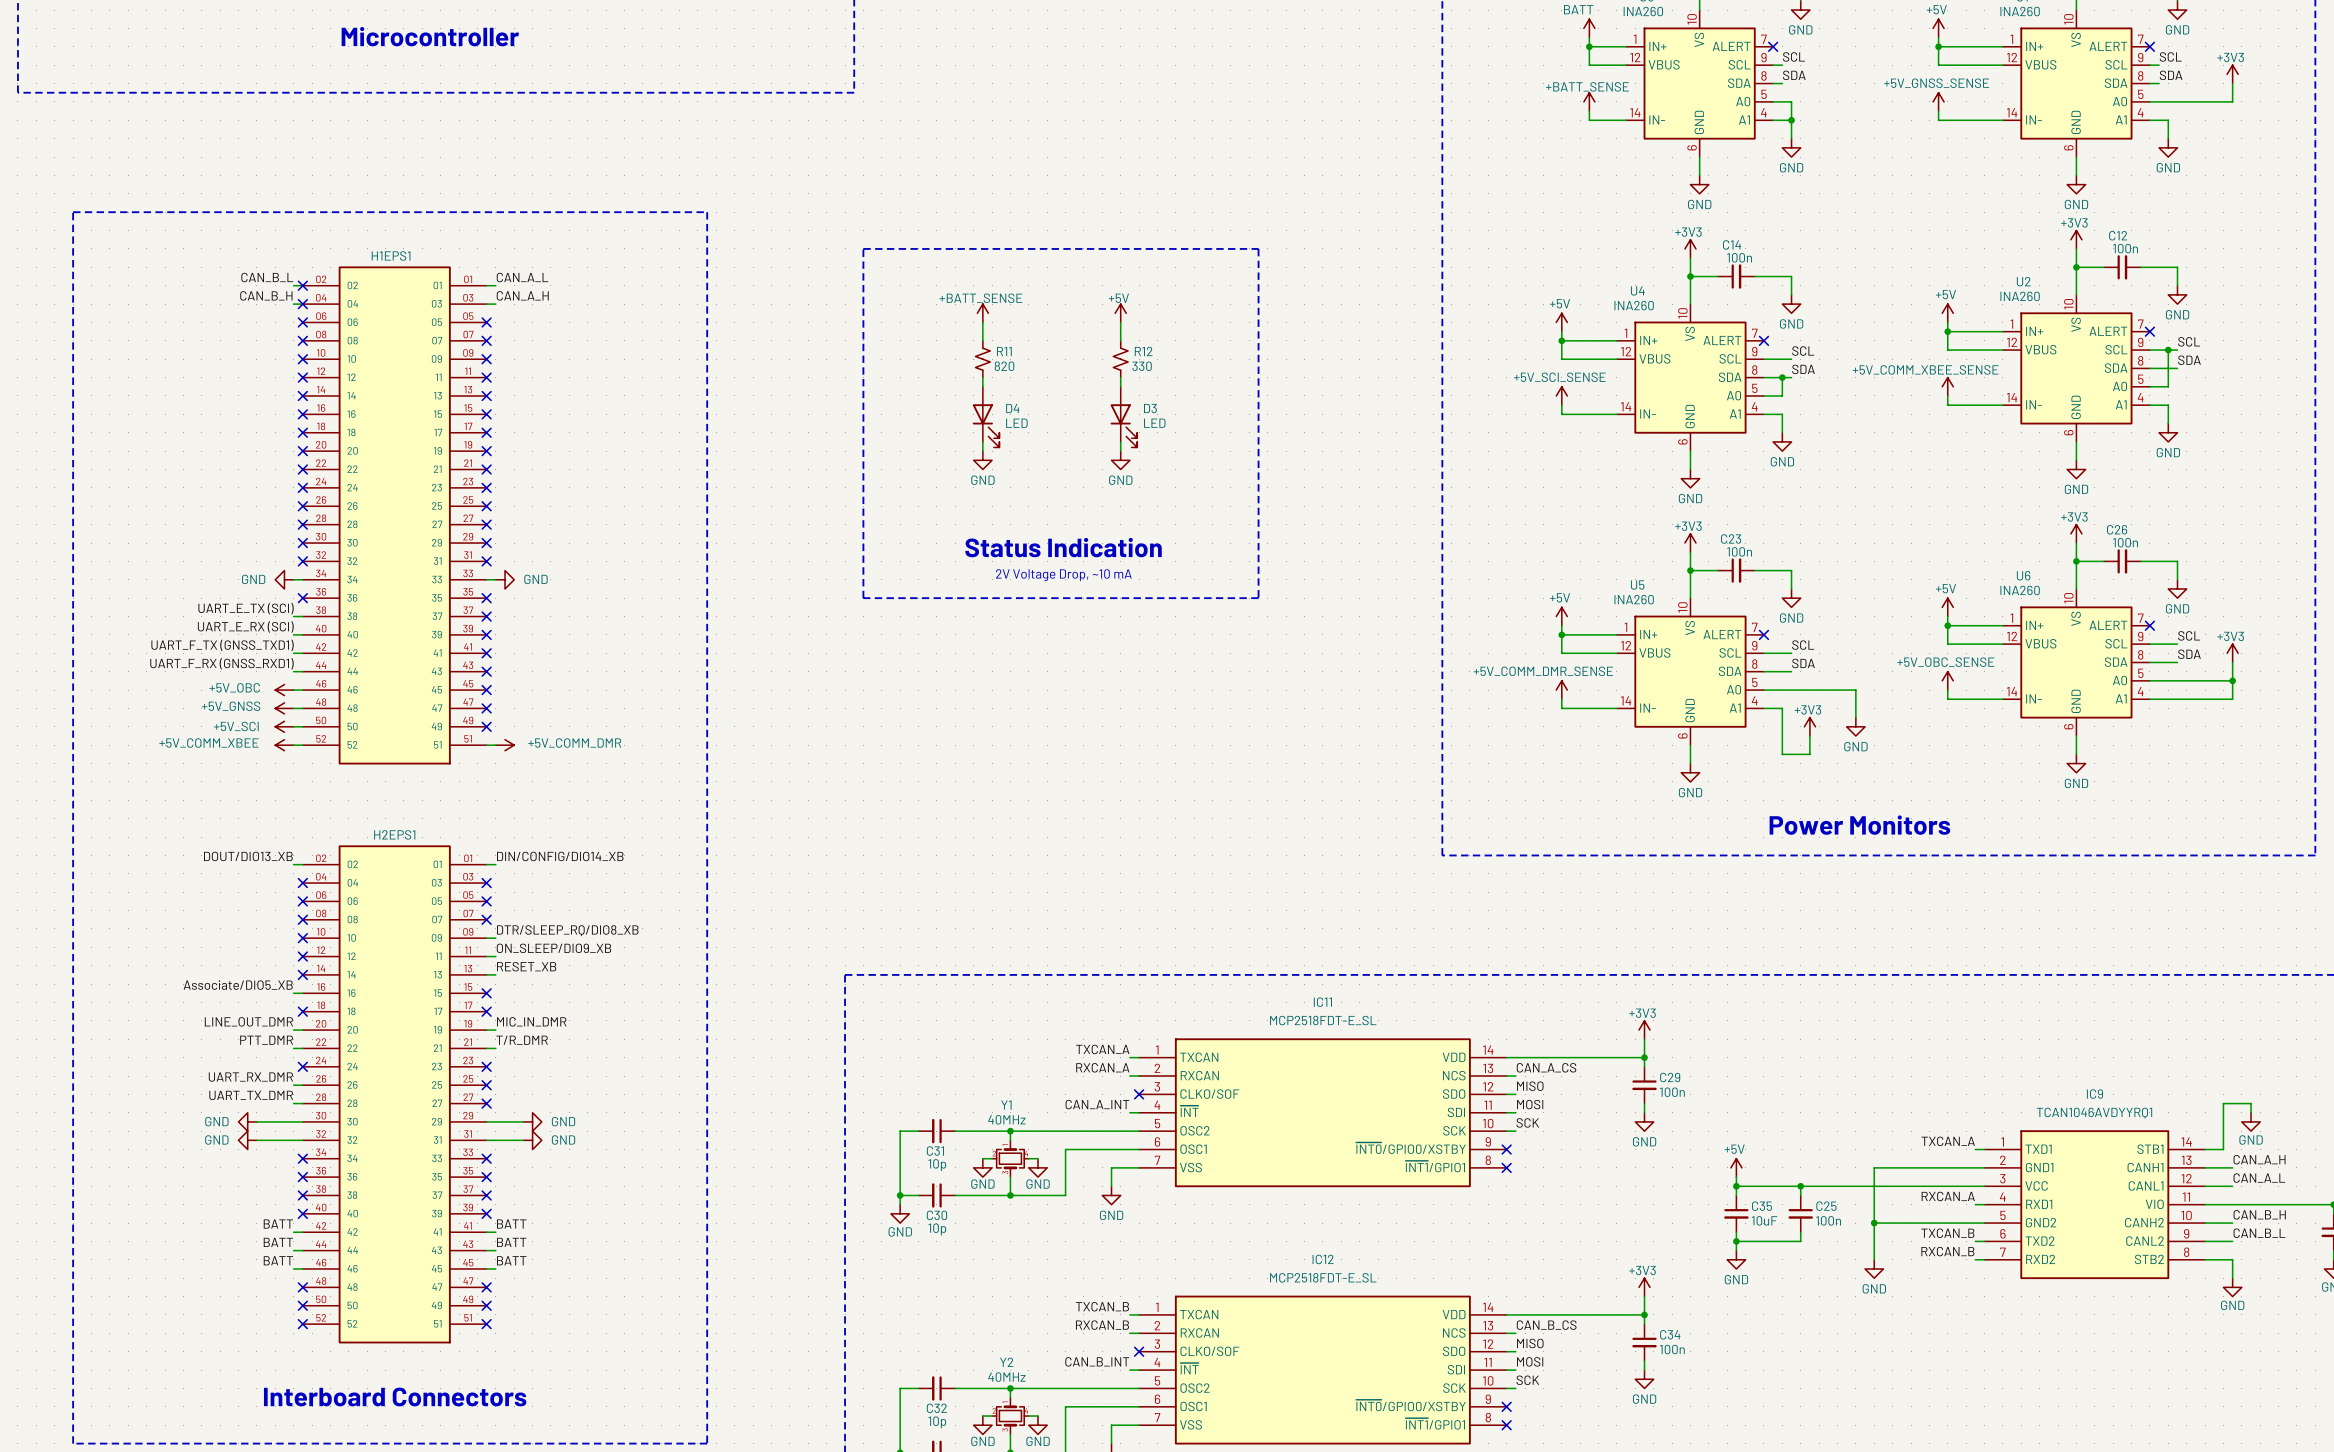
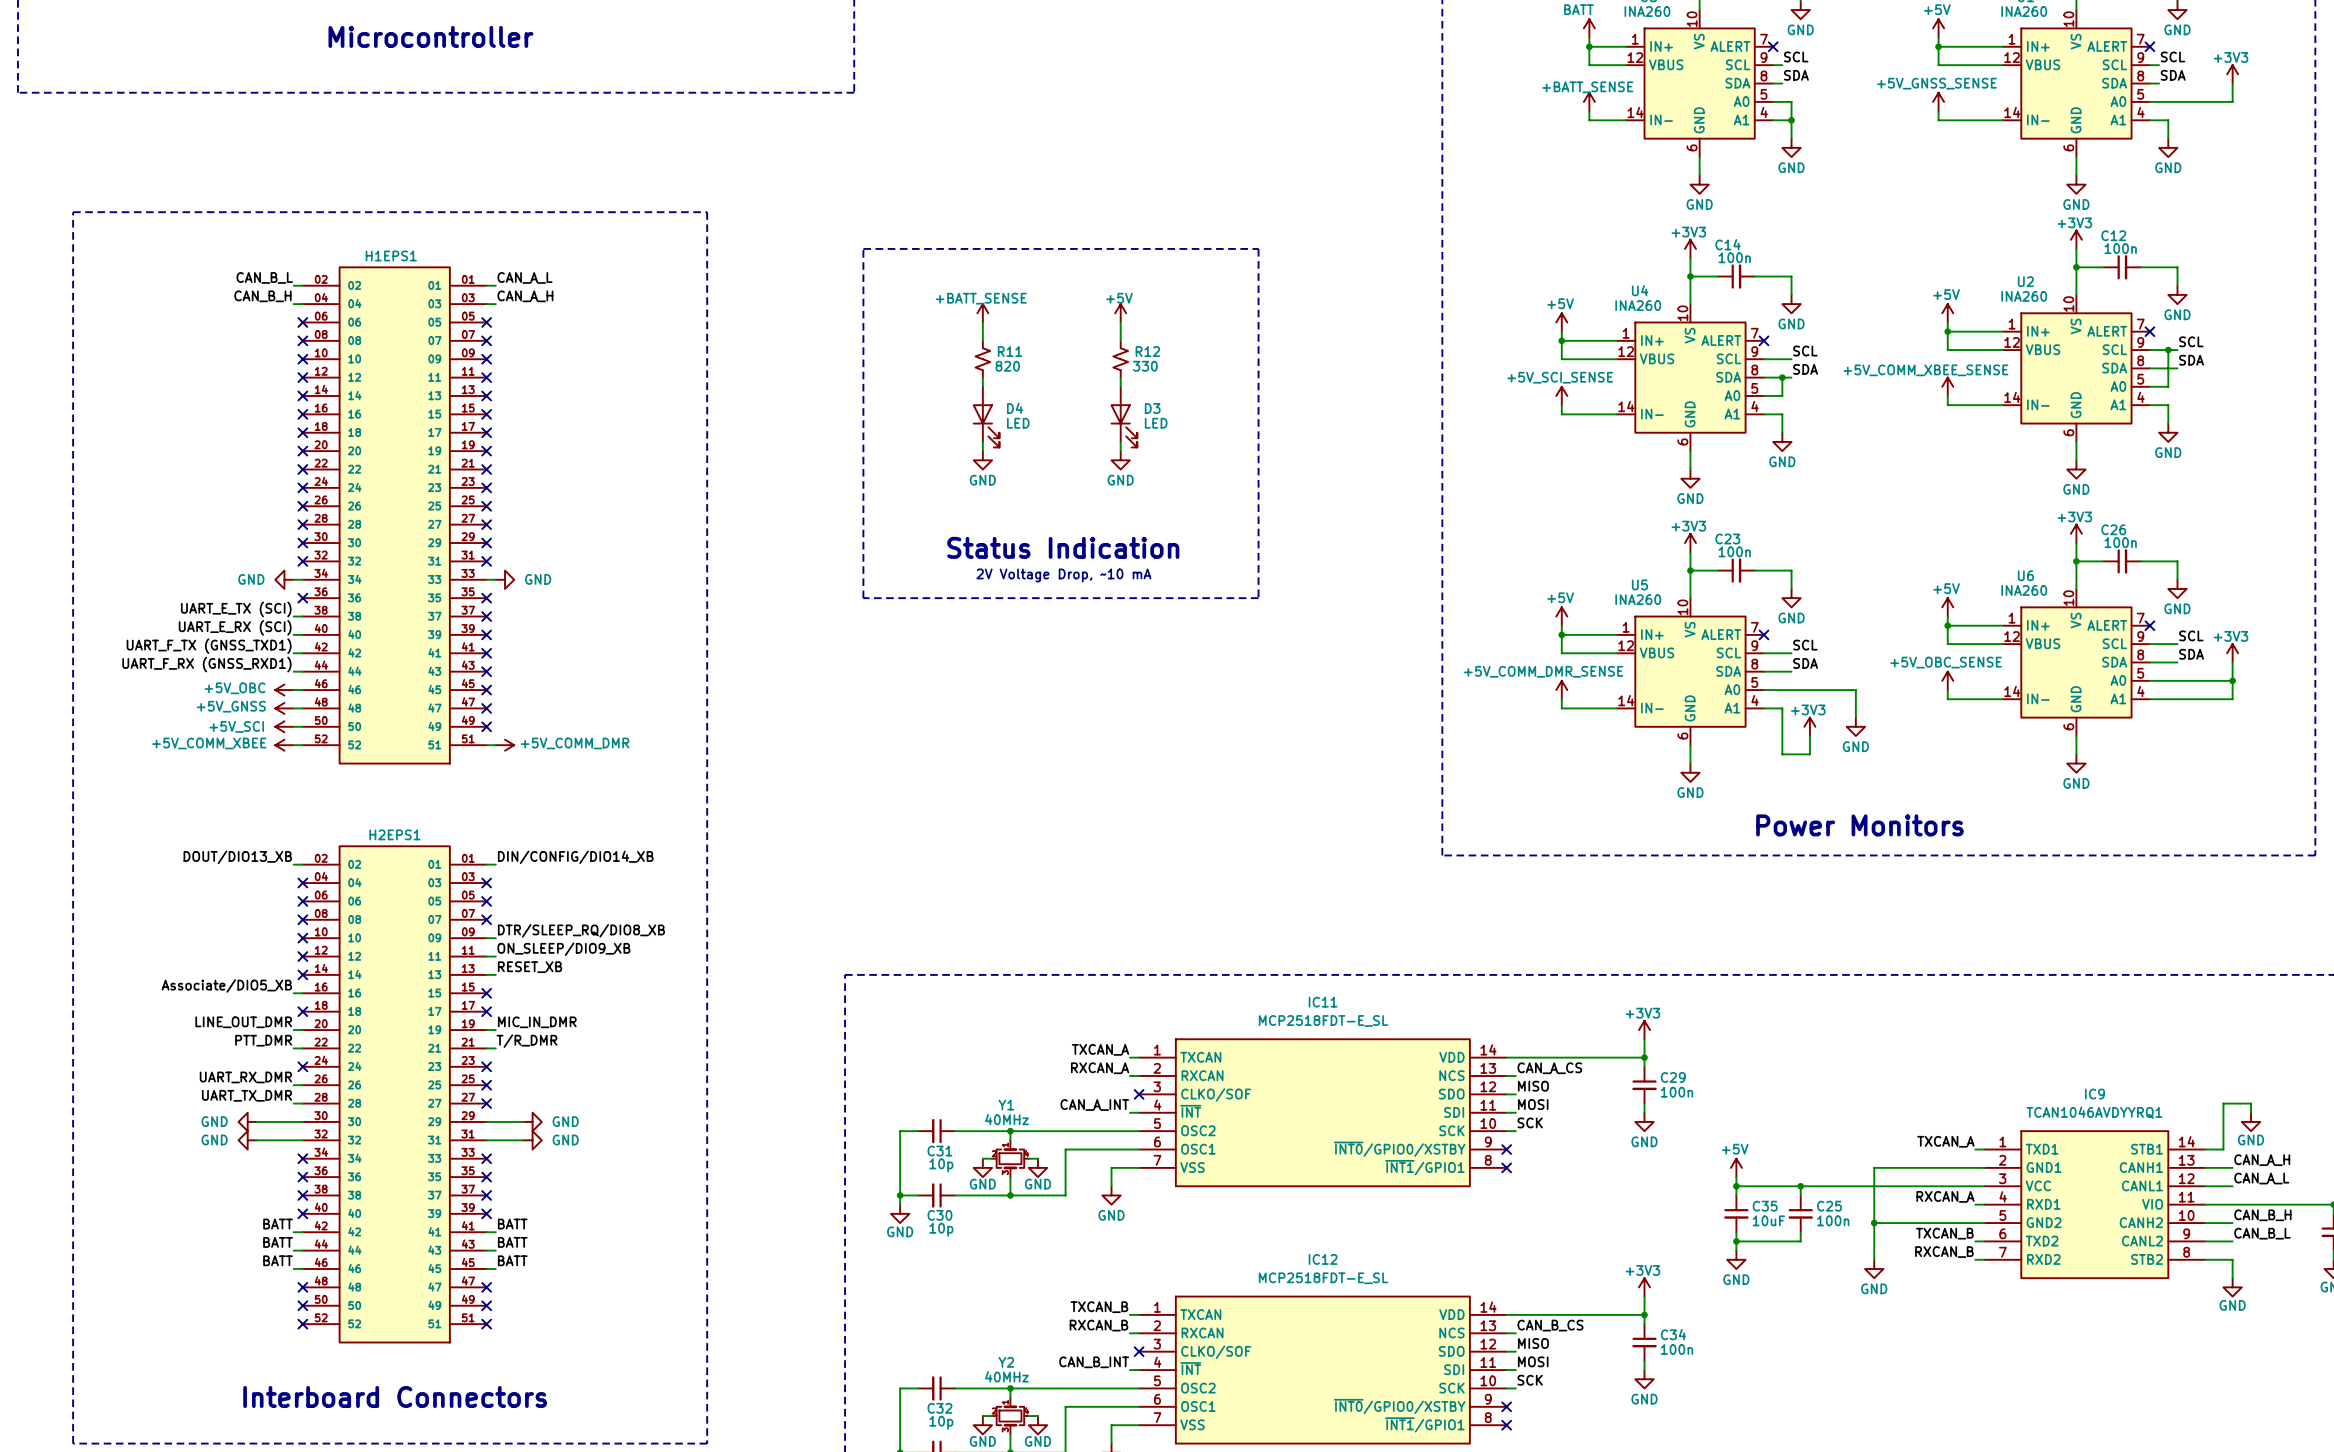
no-connect mark: (302, 285) -> none
no-connect mark: (302, 304) -> none

